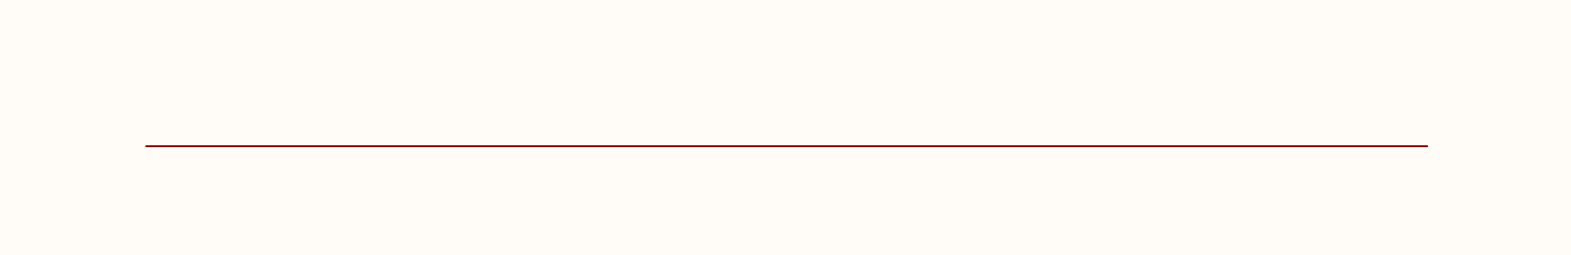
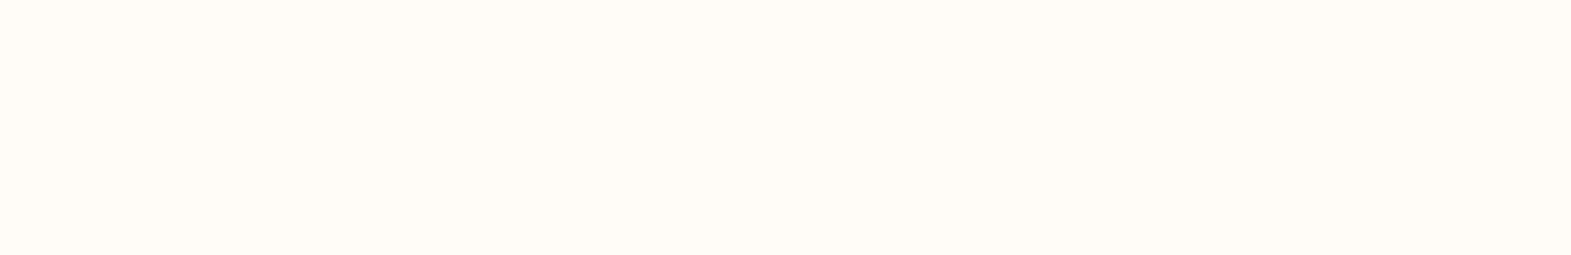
part: (786, 146) -> none

